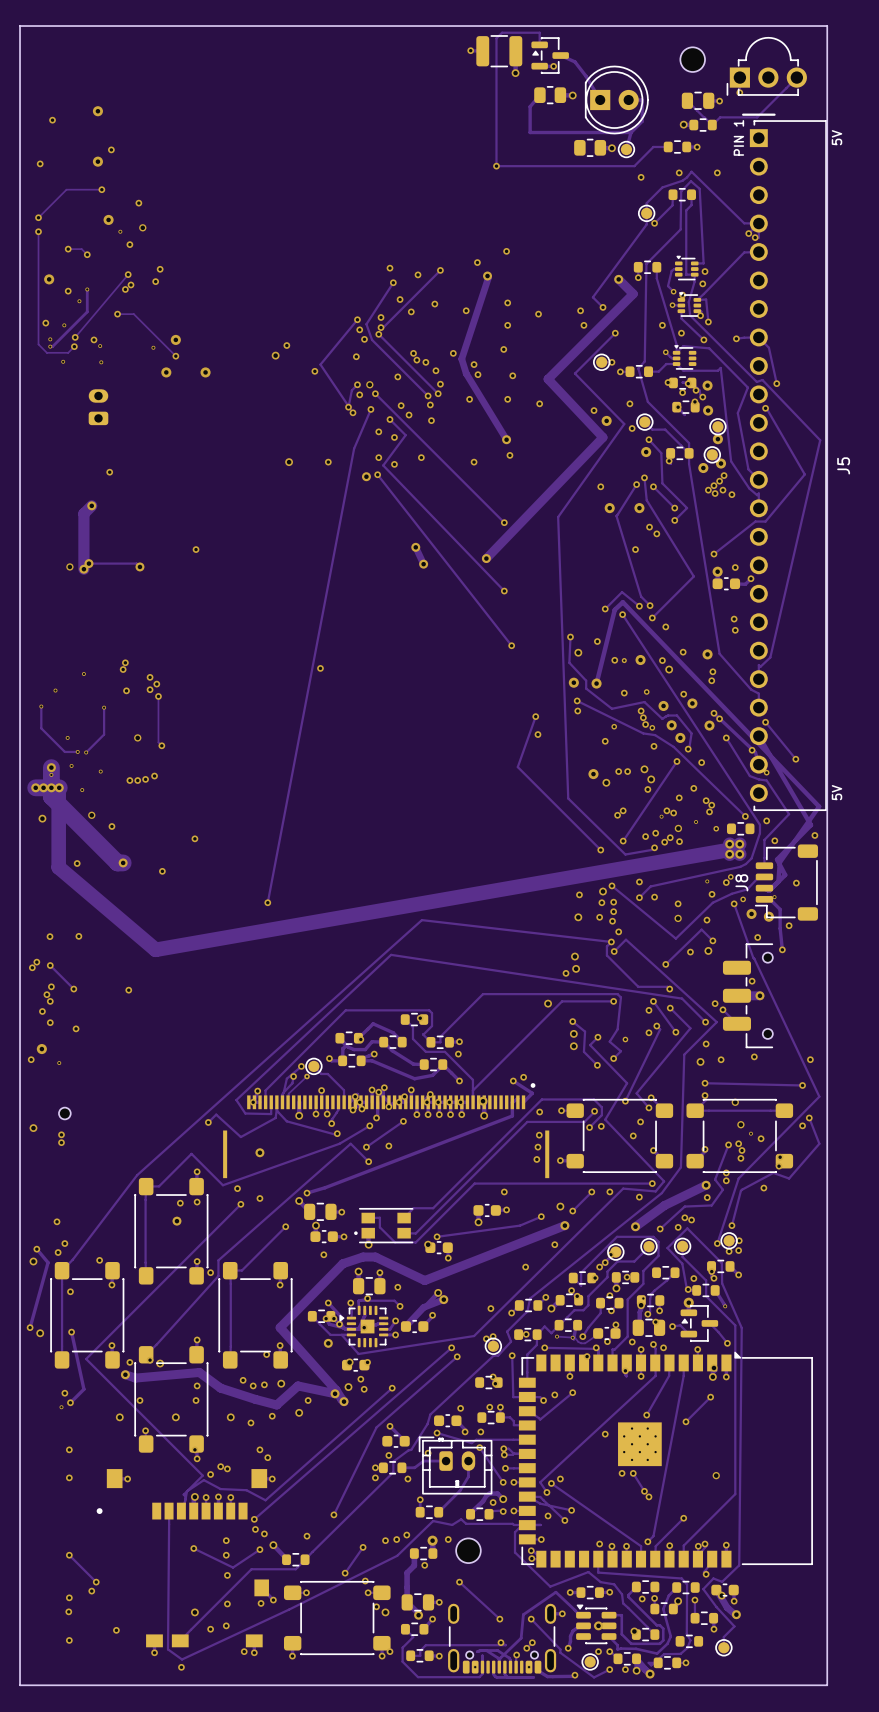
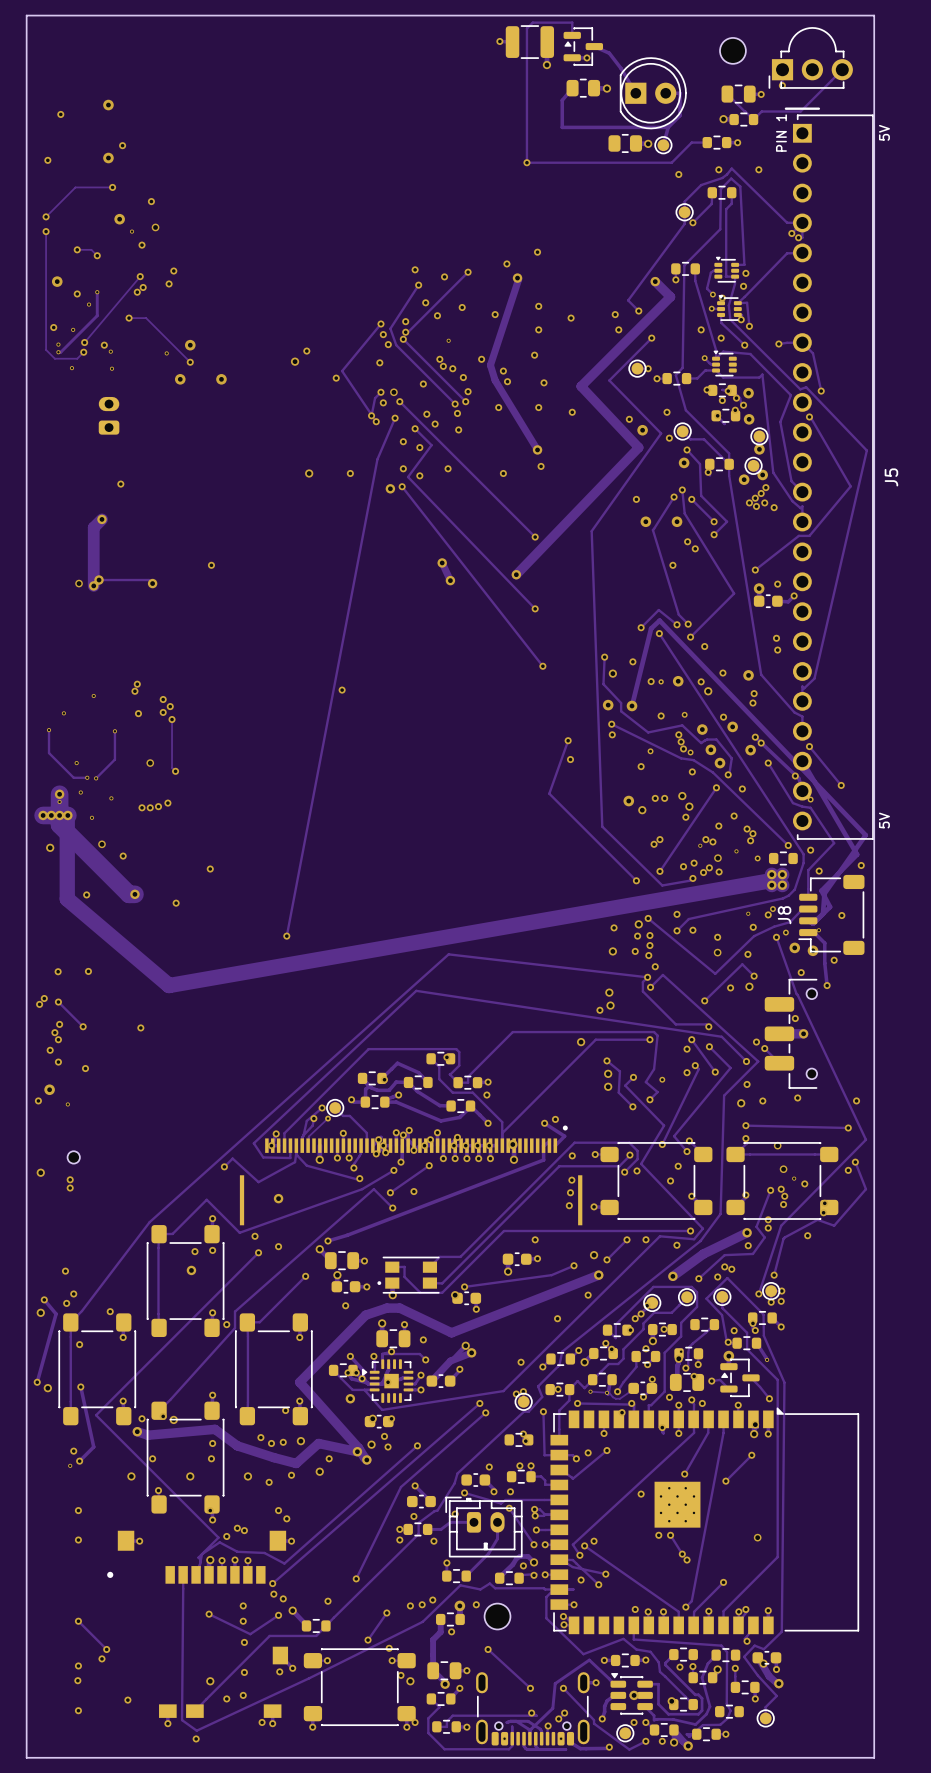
via: none -> (448, 340)

